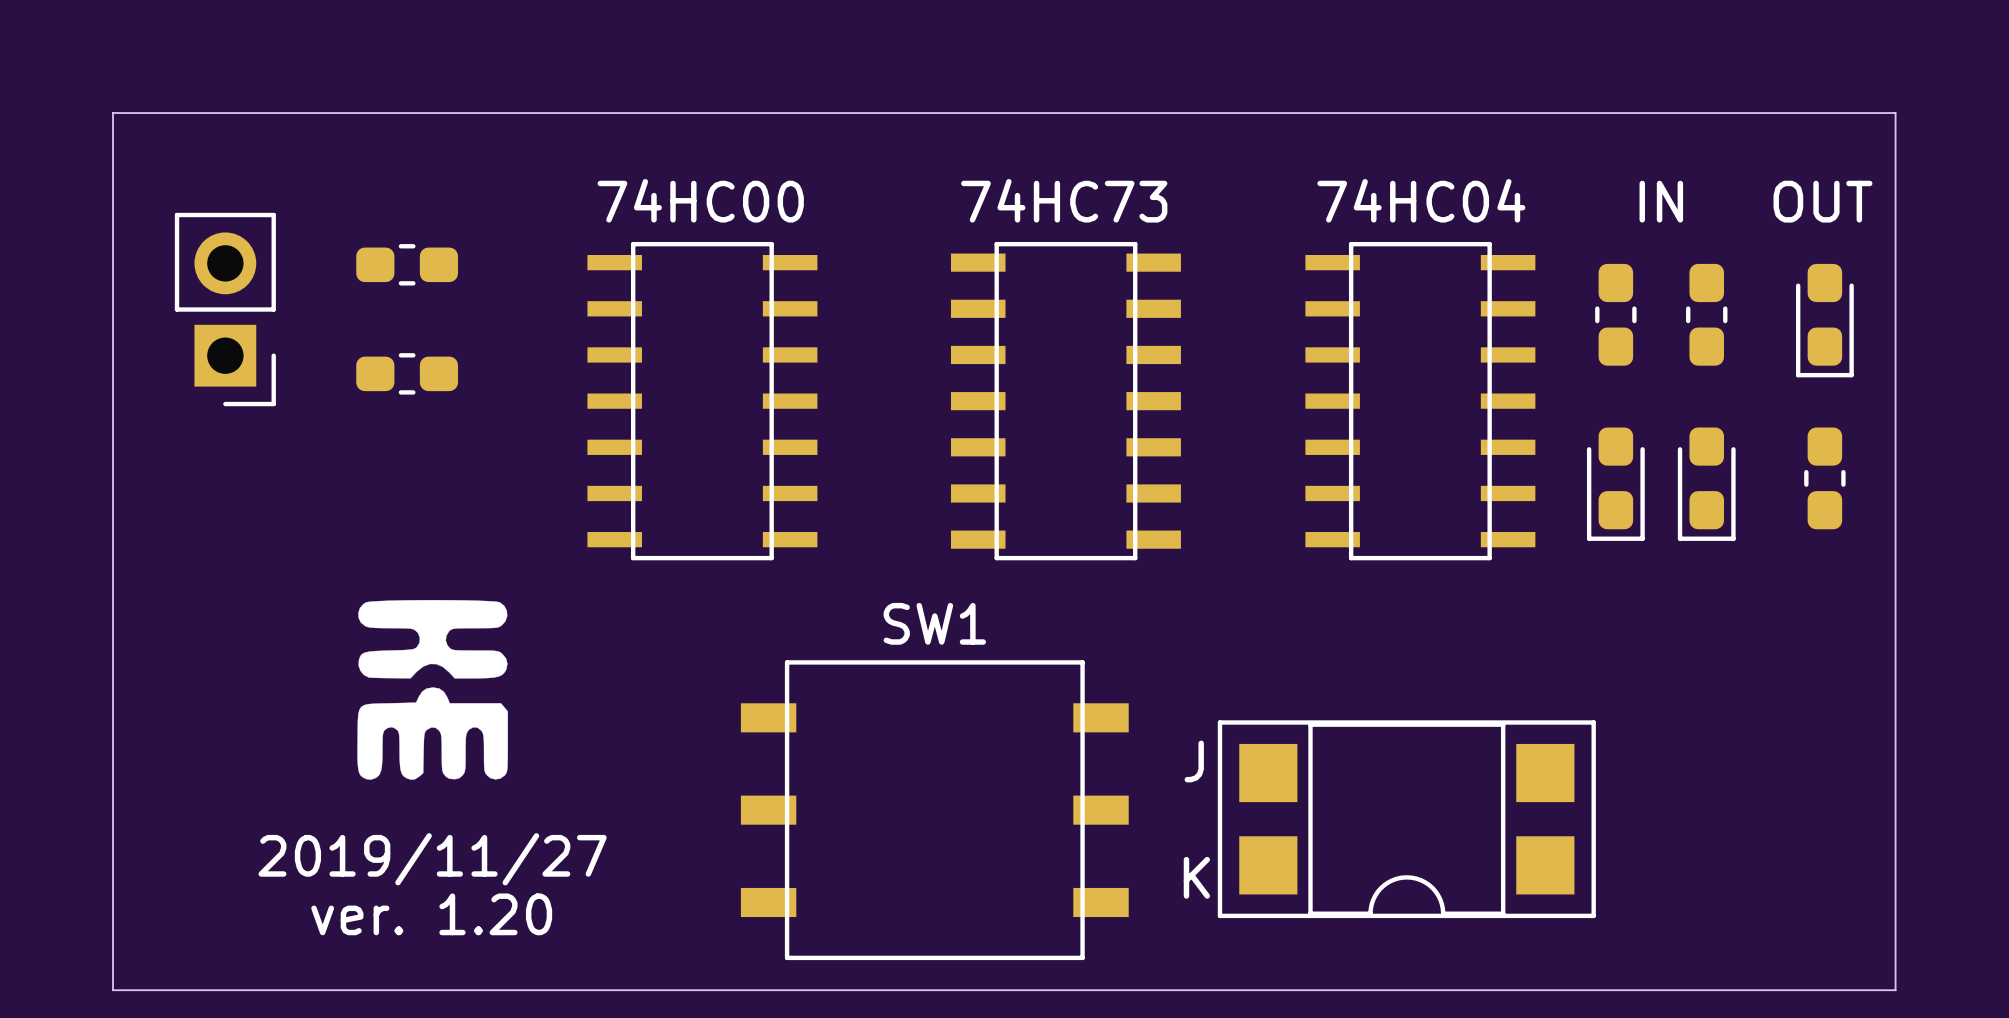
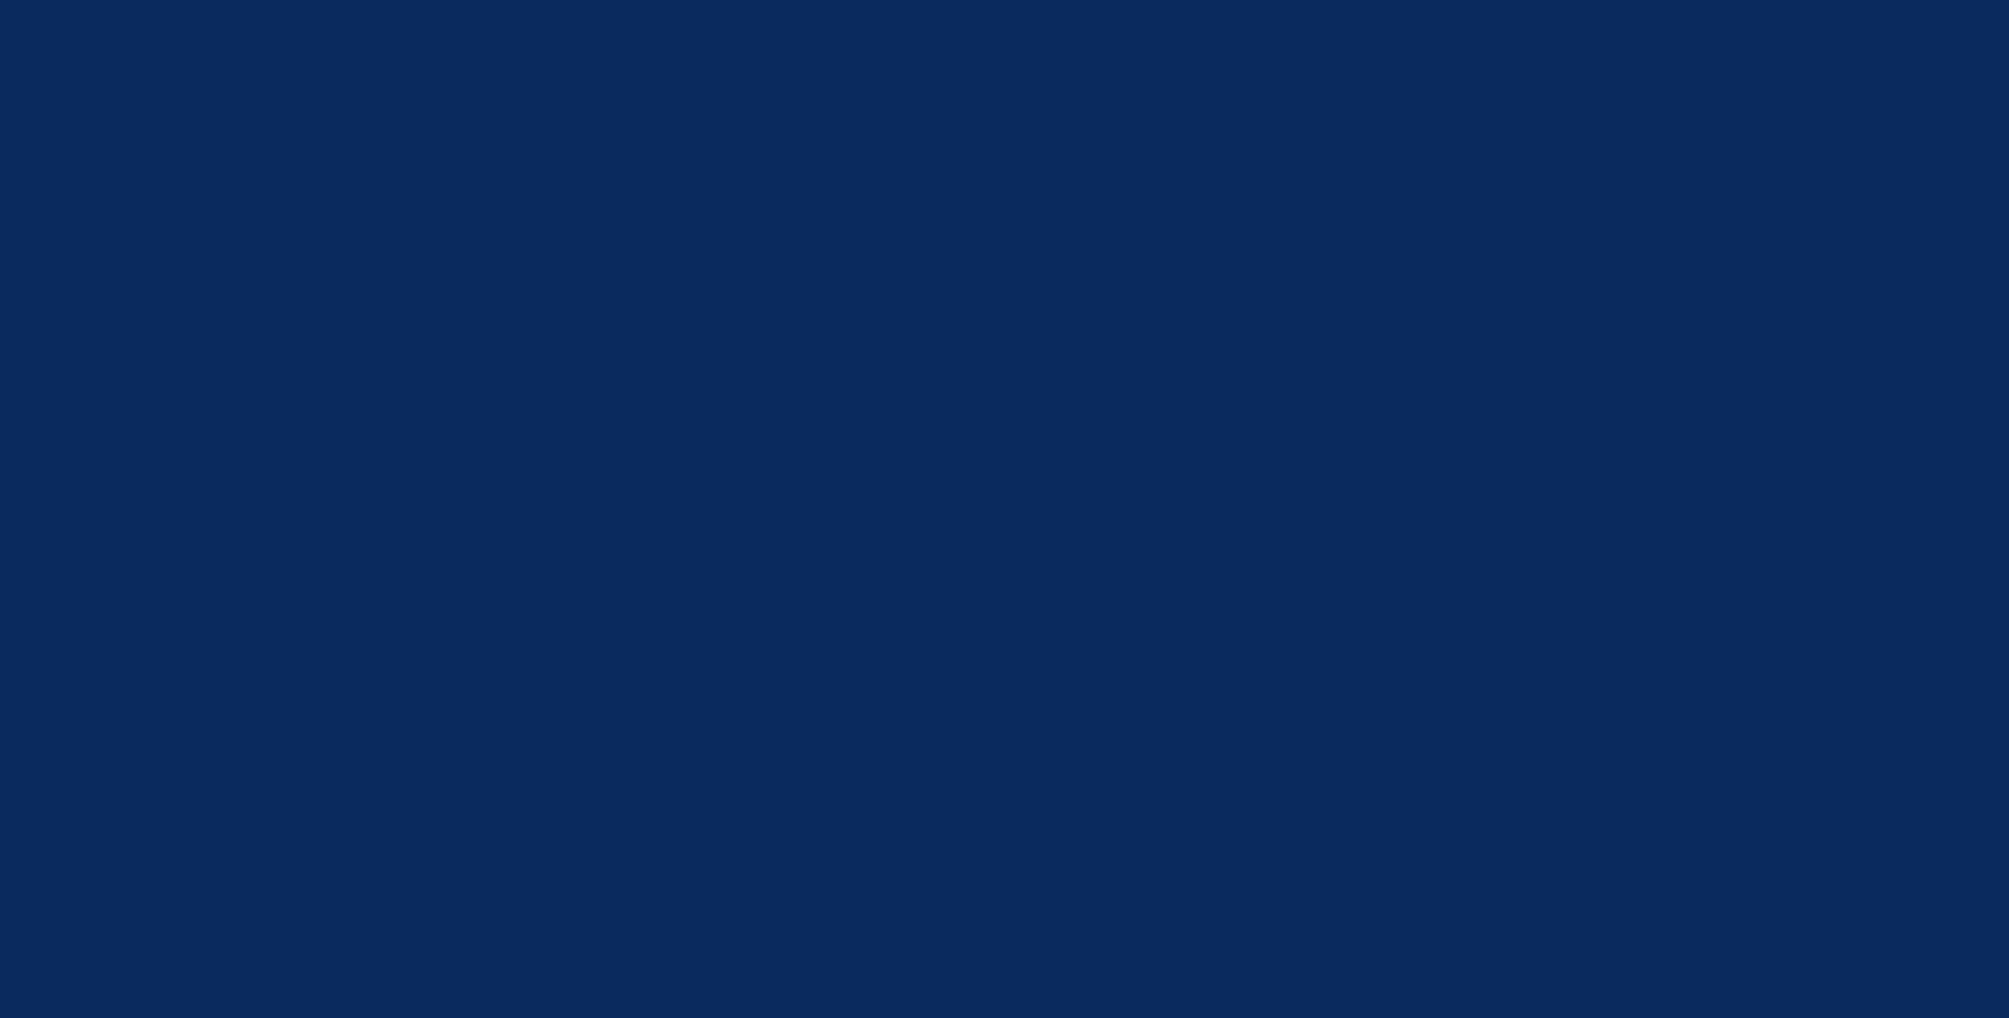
board edge: (113, 113) (113, 990) (1895, 990) (1895, 113) (113, 113) -> none
text: 74HC00 (700, 200) -> none
text: 74HC73 (1064, 200) -> none
text: 74HC04 (1421, 200) -> none
text: IN (1661, 201) -> none
text: OUT (1822, 201) -> none
part: (407, 264) -> none
part: (225, 309) -> none
part: (1615, 314) -> none
part: (1706, 314) -> none
part: (1824, 320) -> none
part: (407, 373) -> none
part: (702, 401) -> none
part: (1065, 401) -> none
part: (1420, 401) -> none
part: (1824, 478) -> none
part: (1615, 484) -> none
part: (1706, 484) -> none
drawing: [357, 600, 508, 780] -> none
text: J (1194, 761) -> none
SW1: (934, 810) -> none
part: (1406, 819) -> none
text: 2019/11/27 (432, 859) -> none
text: K (1196, 877) -> none
text: ver. 1.20 (431, 914) -> none

